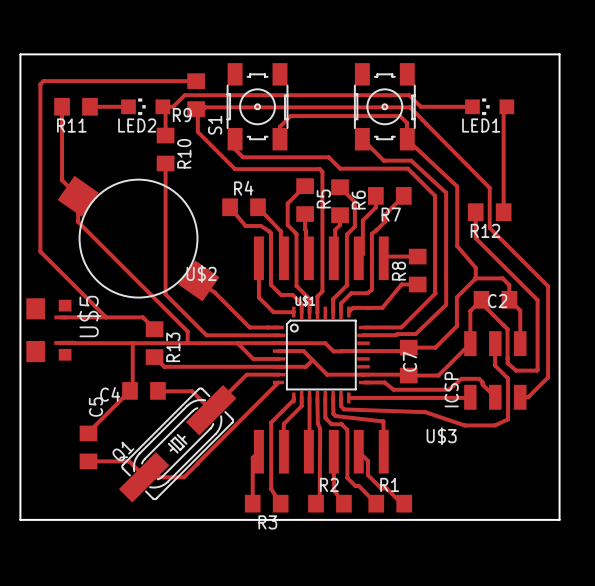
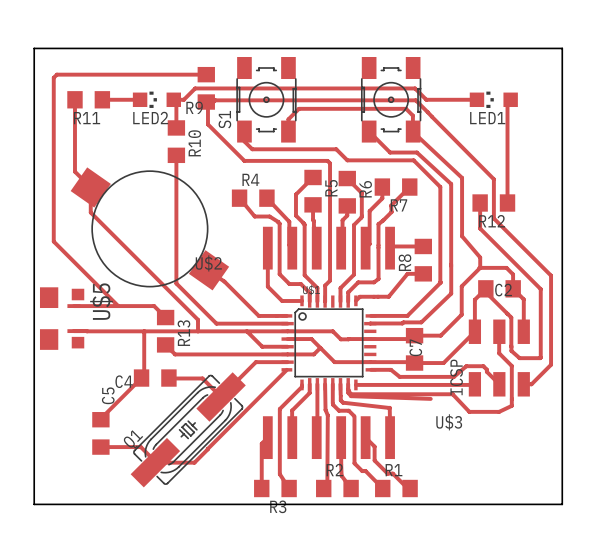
top track: (425, 412) (464, 425) -> (348, 389) (350, 394) (452, 394) (469, 411)

